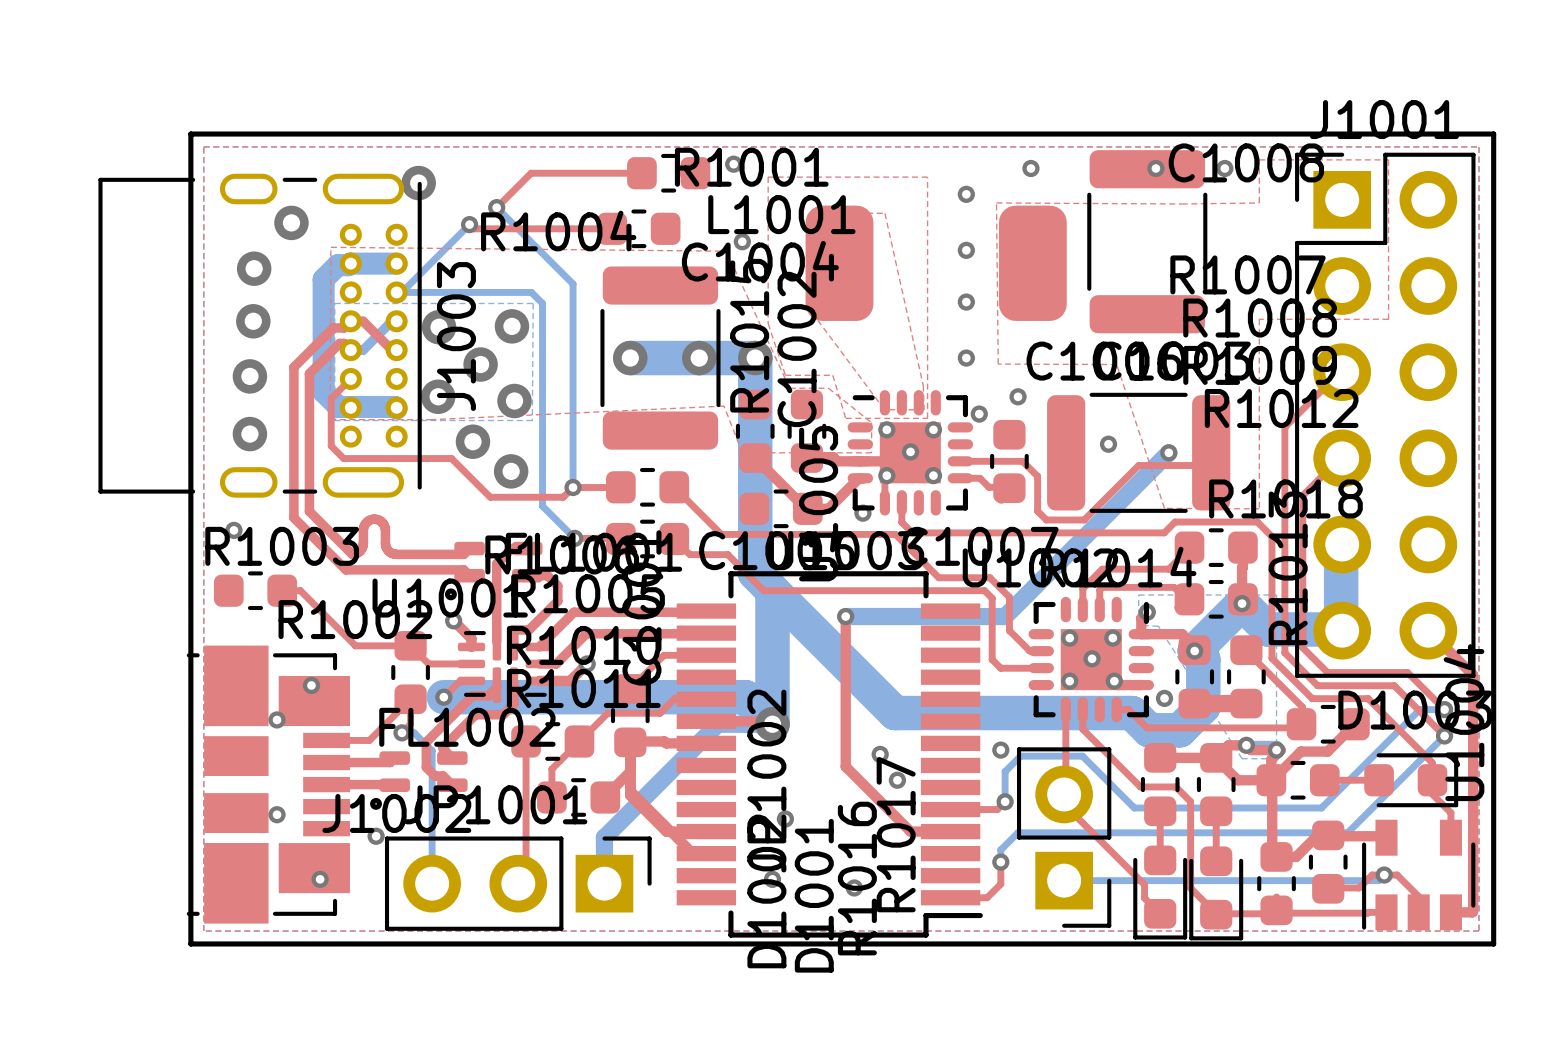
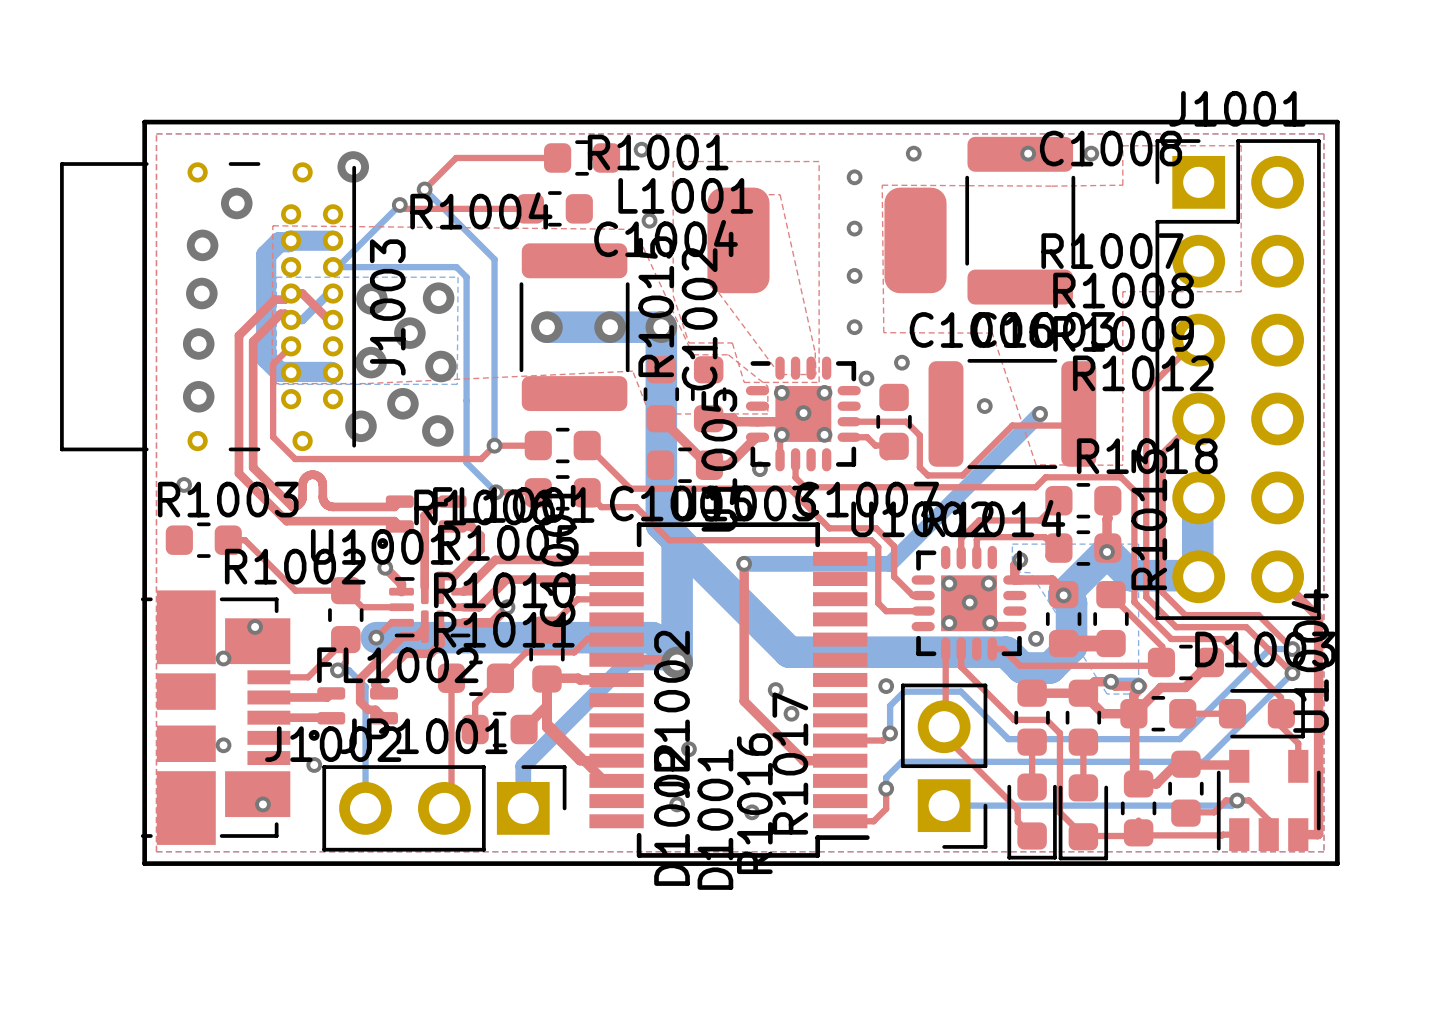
J1003 footprint: [98, 173, 422, 498] -> [60, 162, 357, 452]
top track: (331, 446) (343, 458) (451, 458) (490, 497) (563, 497) -> (273, 407) (273, 437) (295, 459) (481, 459) (485, 454)
via: none -> (360, 426)

